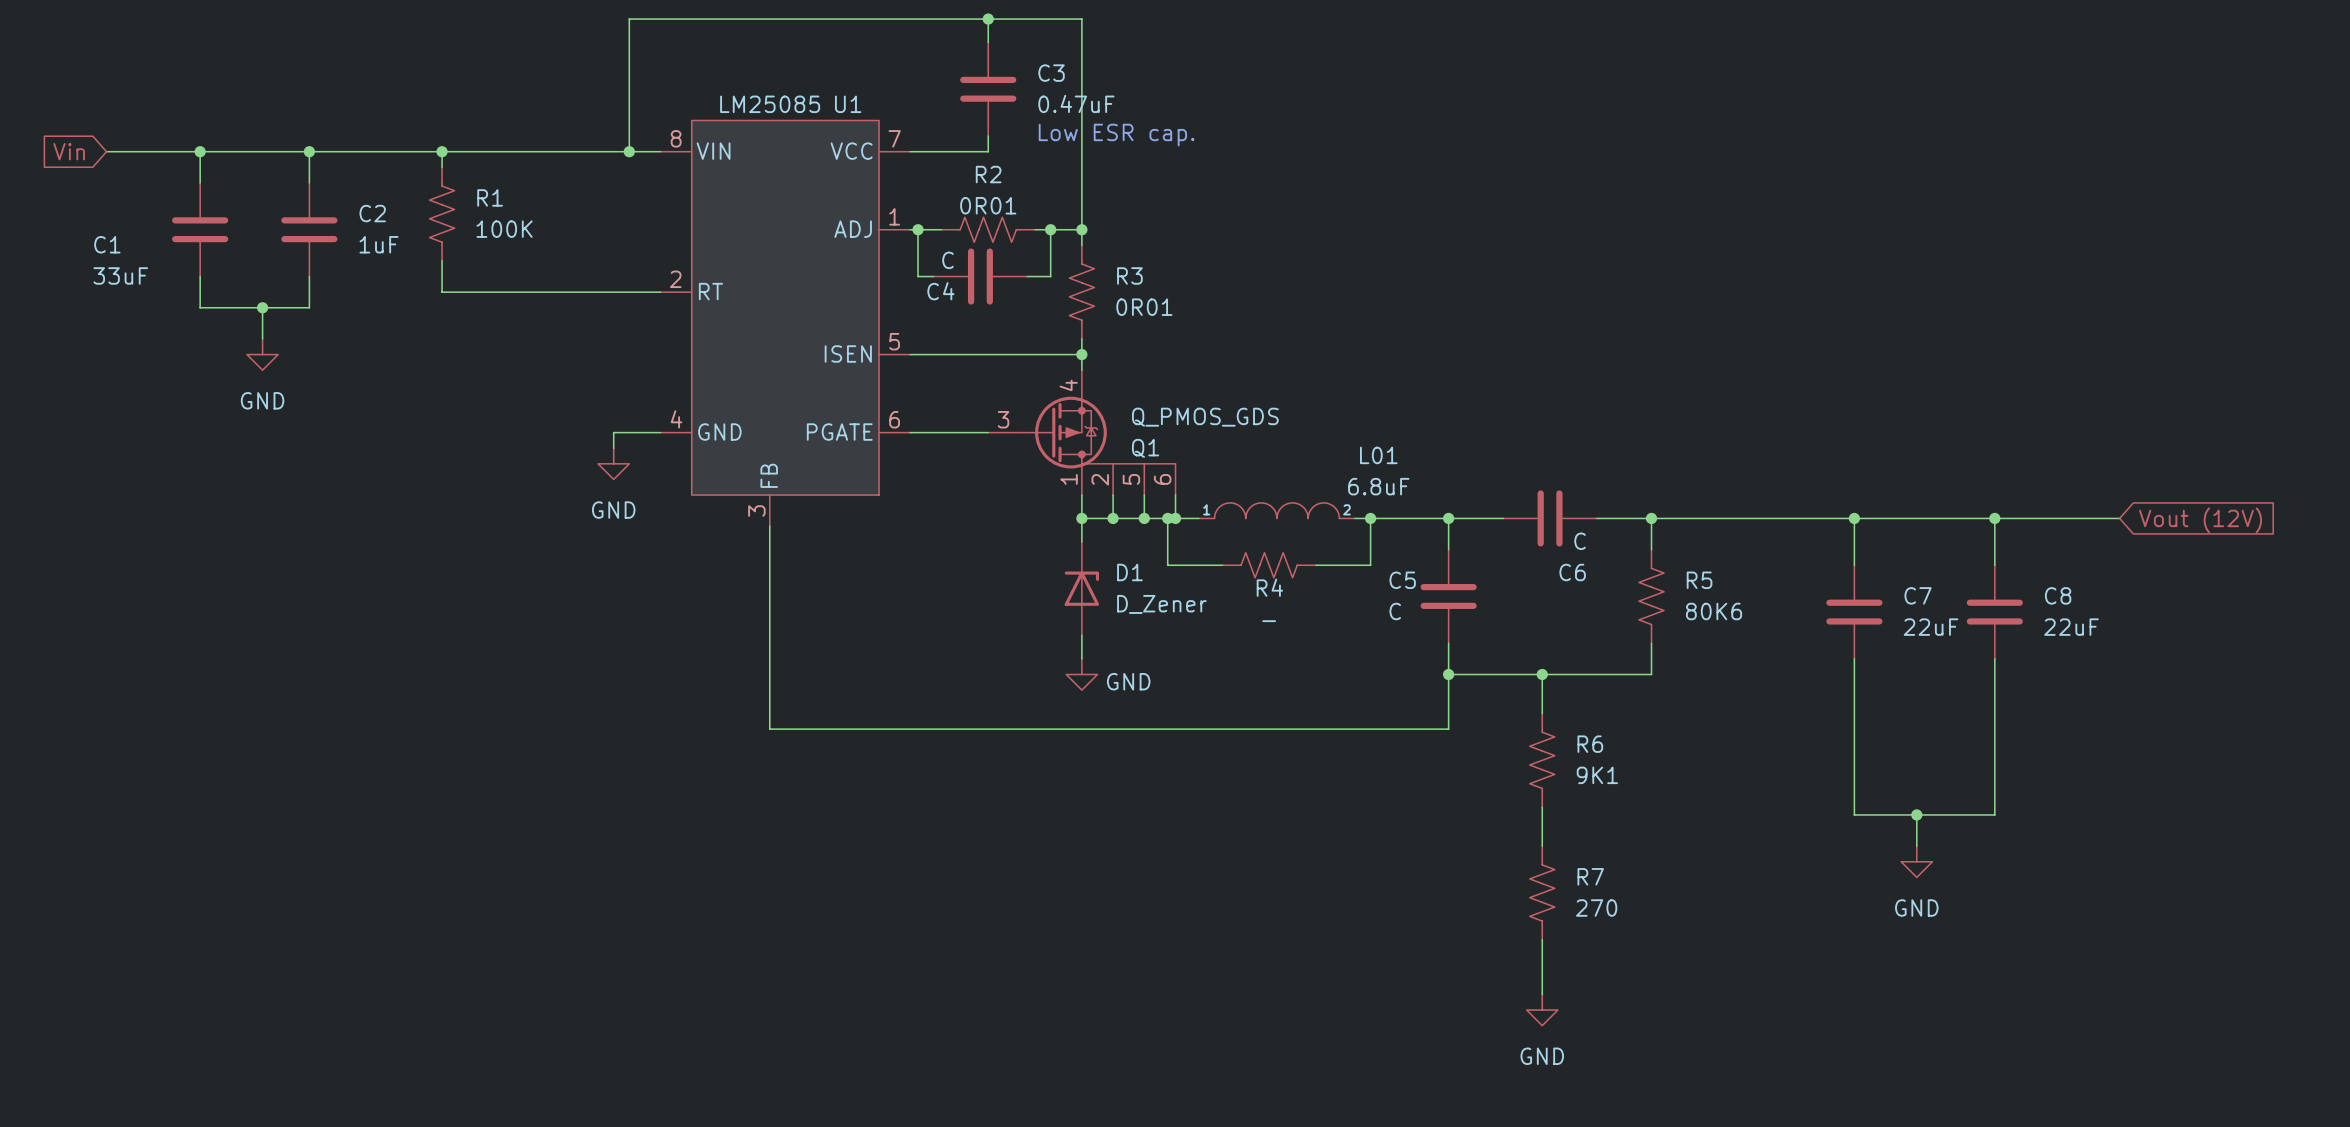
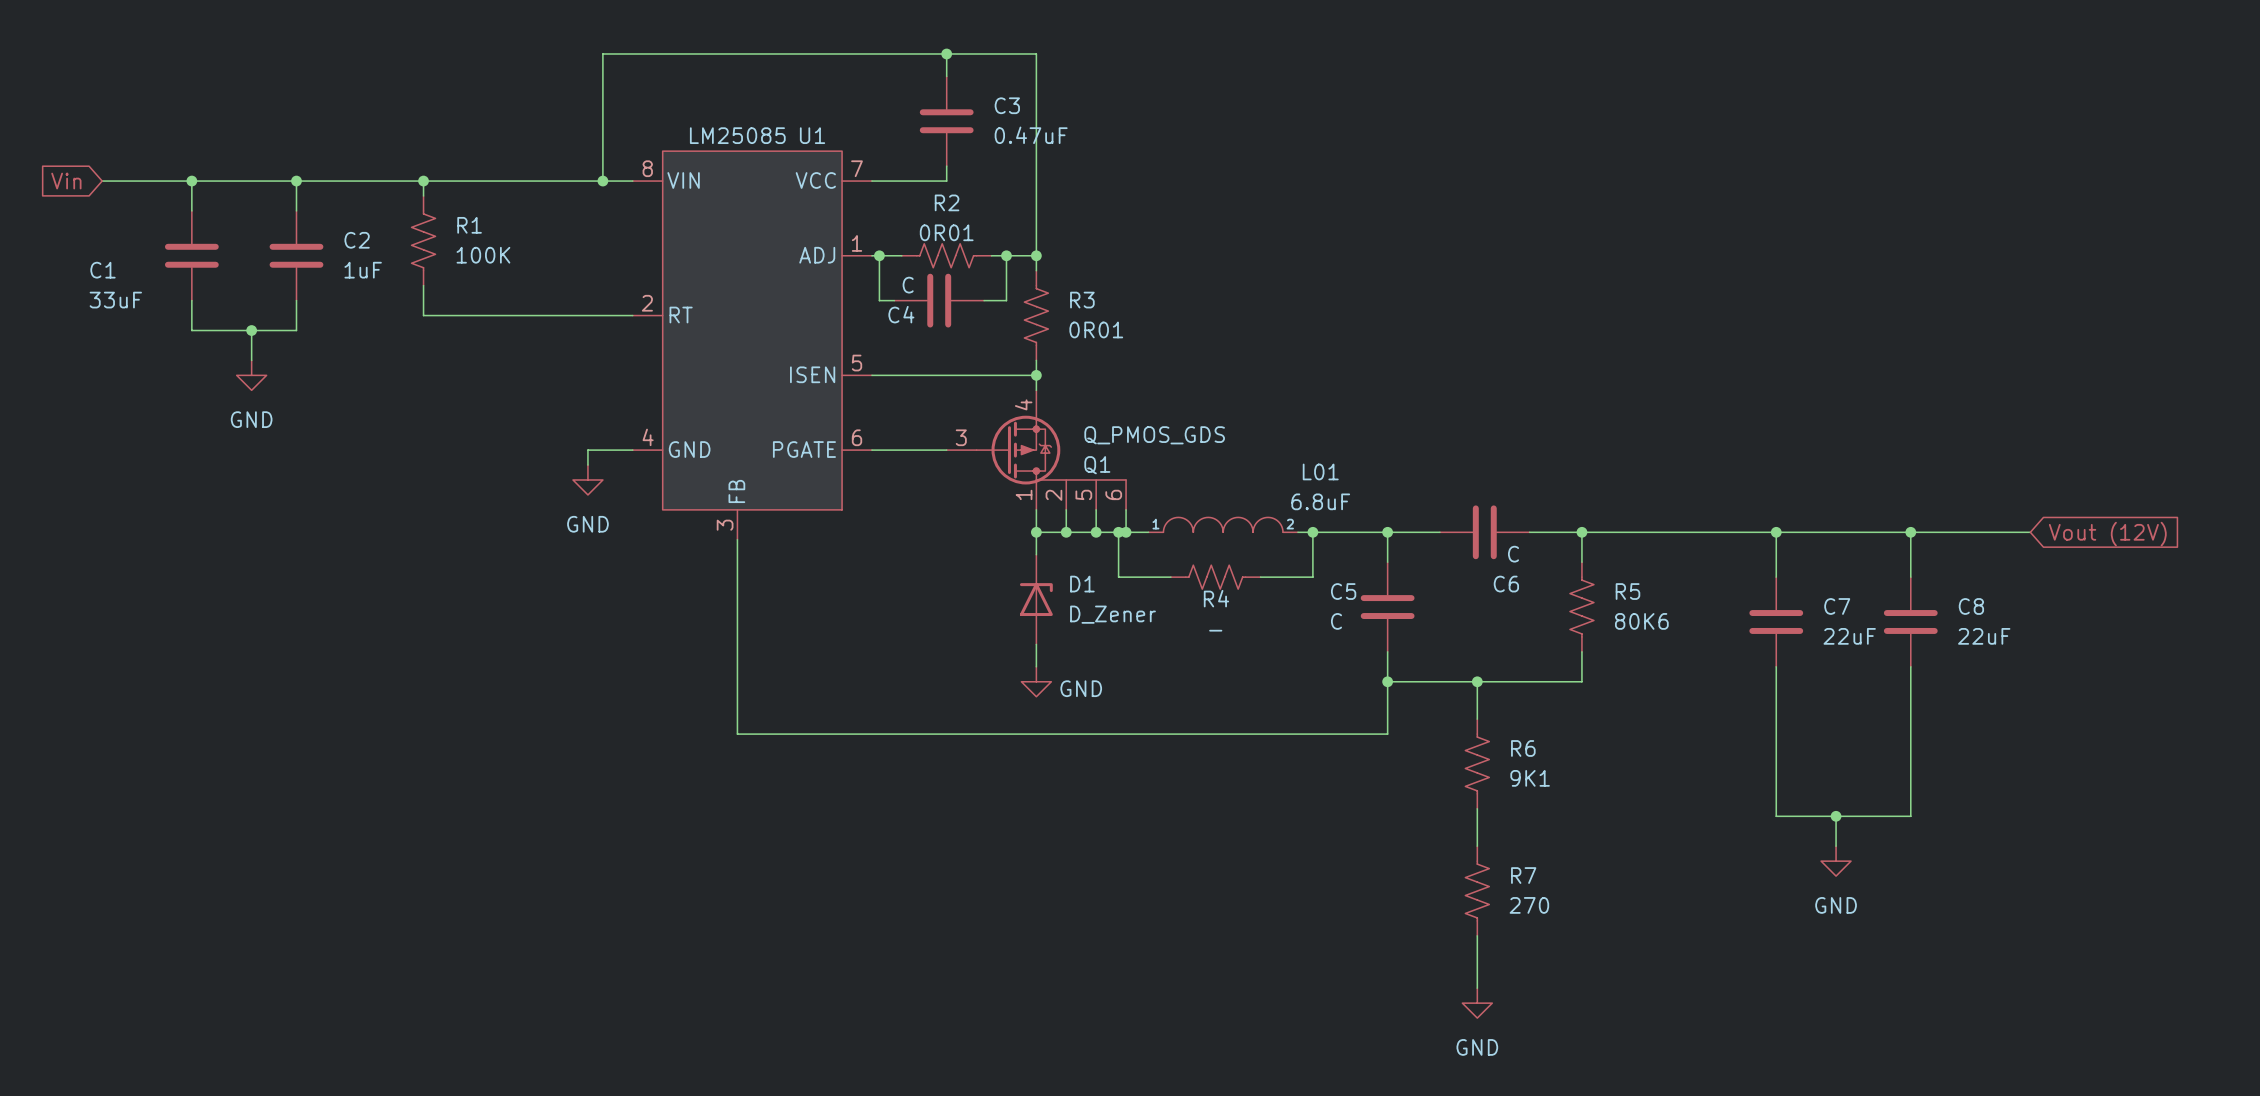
text: Low ESR cap. (1116, 135) -> none

